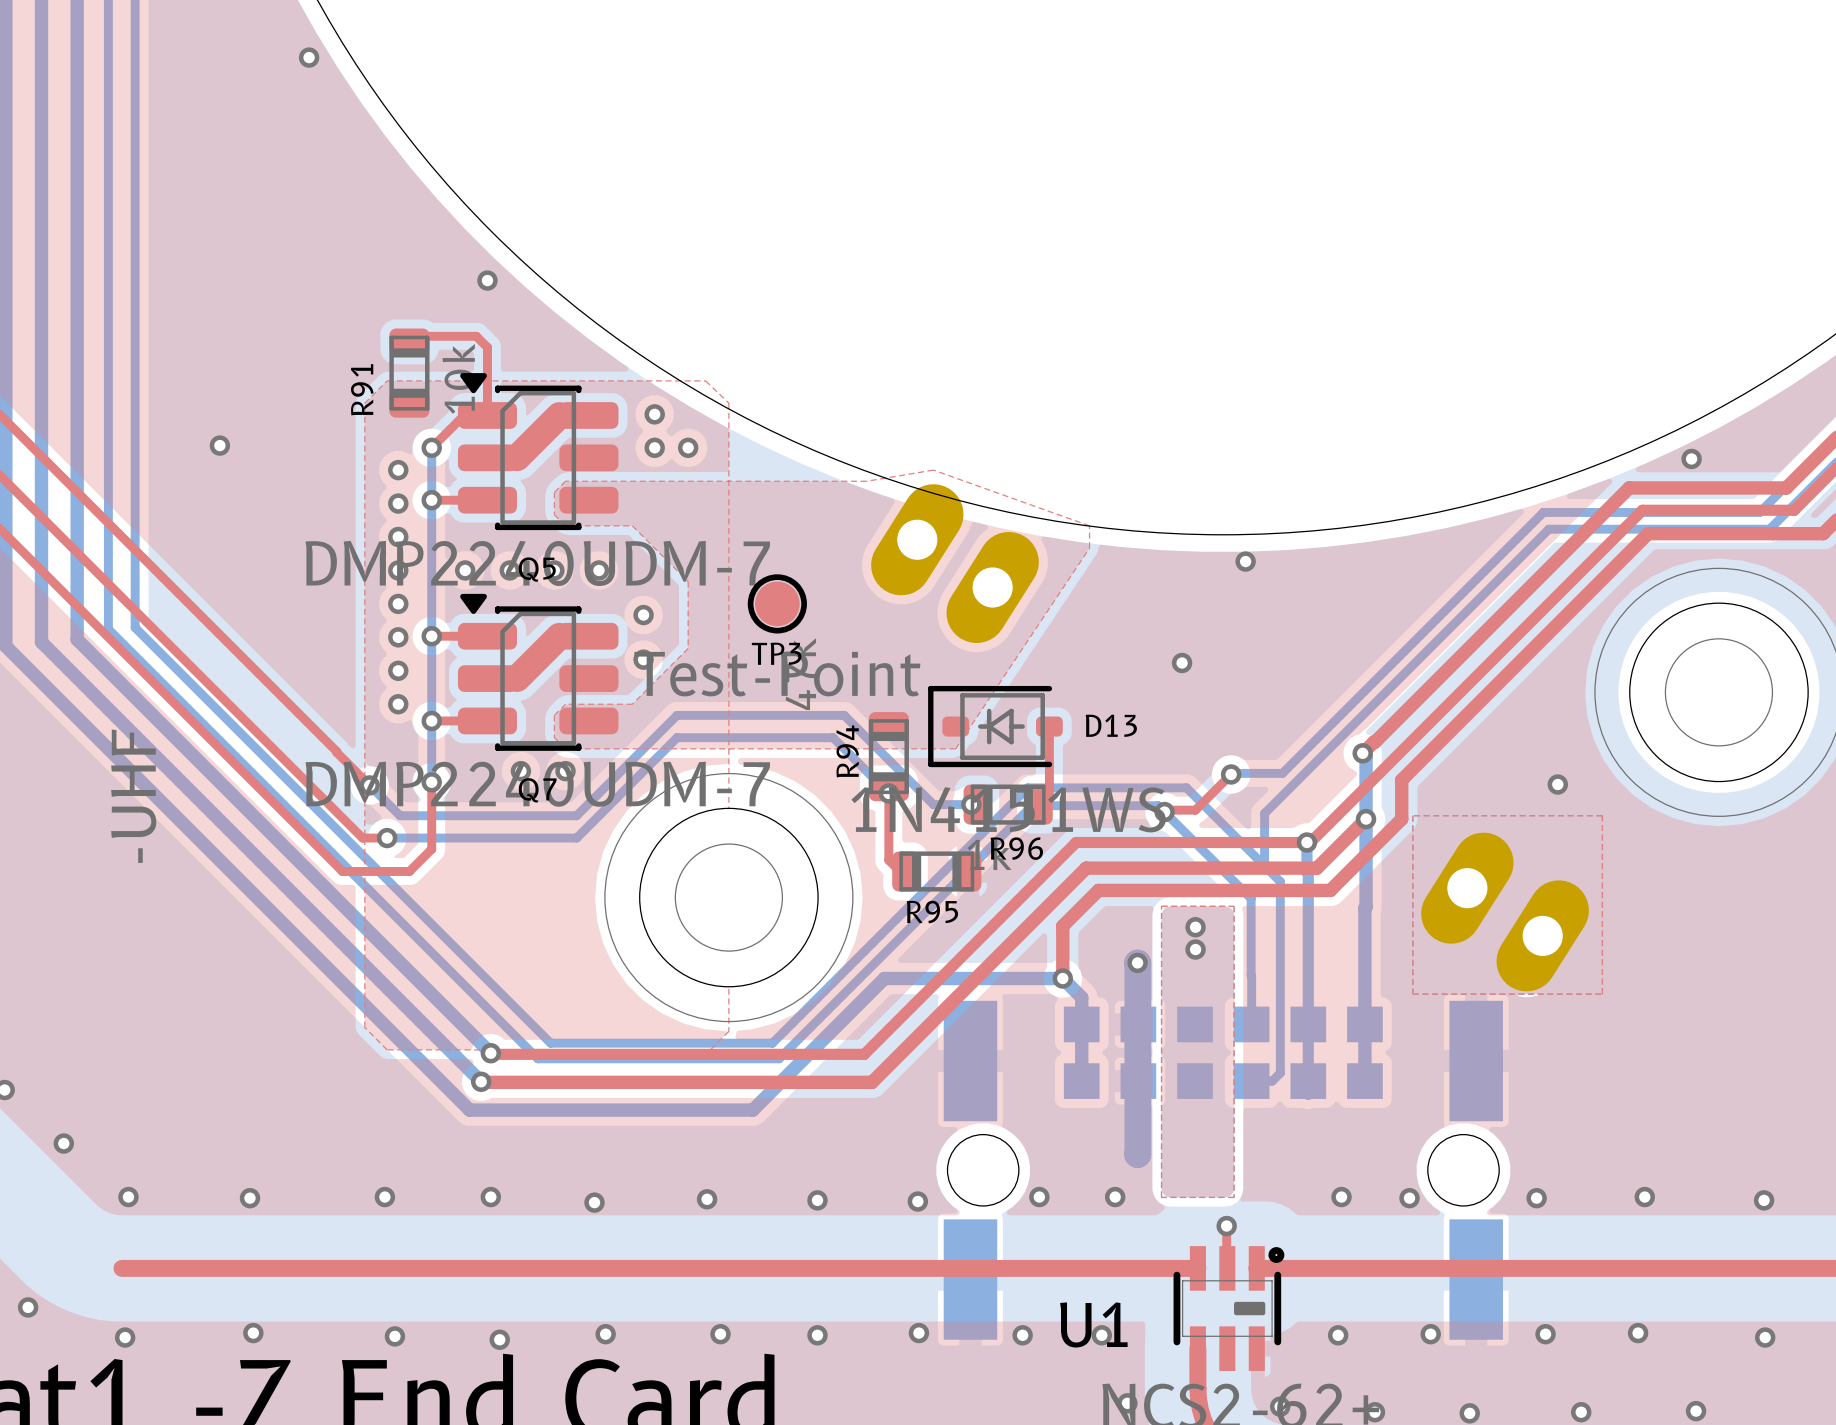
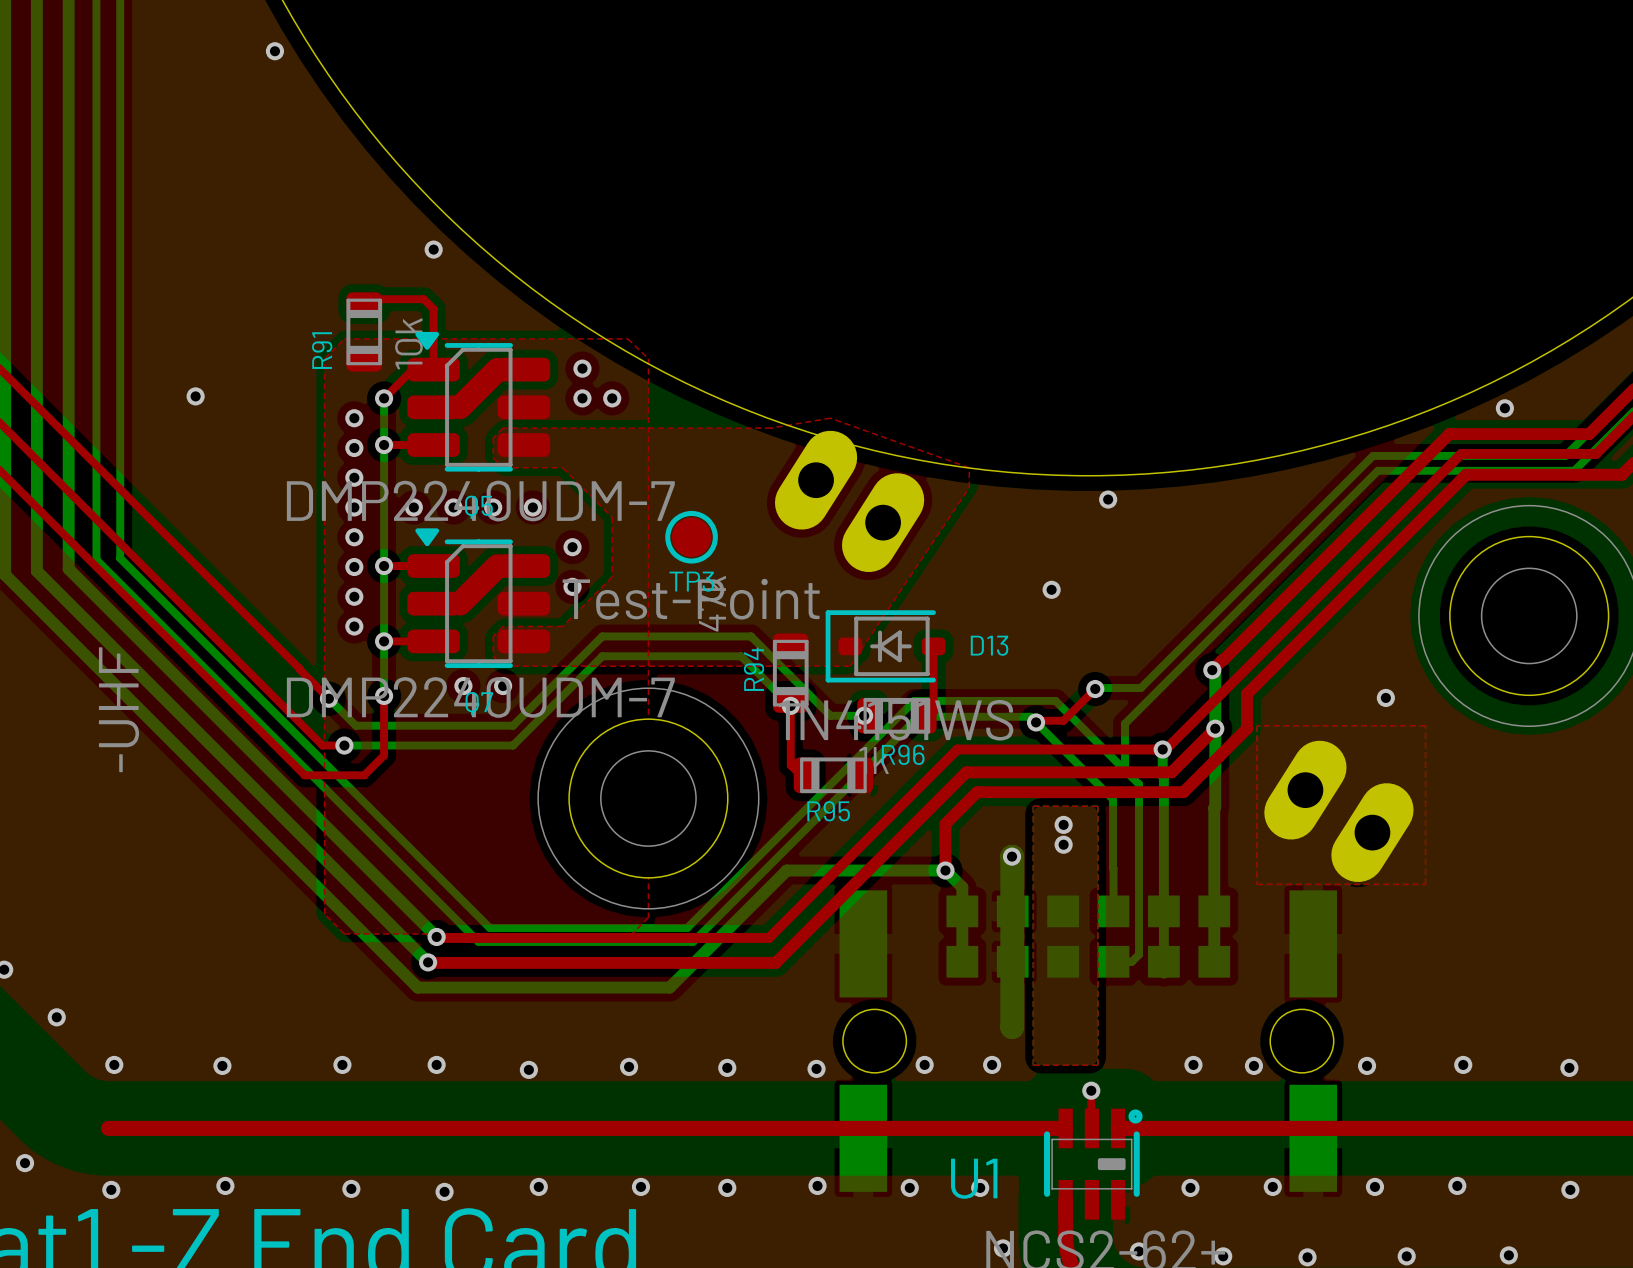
Q5 footprint: [457, 373, 619, 531] -> [407, 331, 551, 472]
Q7 footprint: [457, 593, 619, 751] -> [407, 528, 551, 668]

